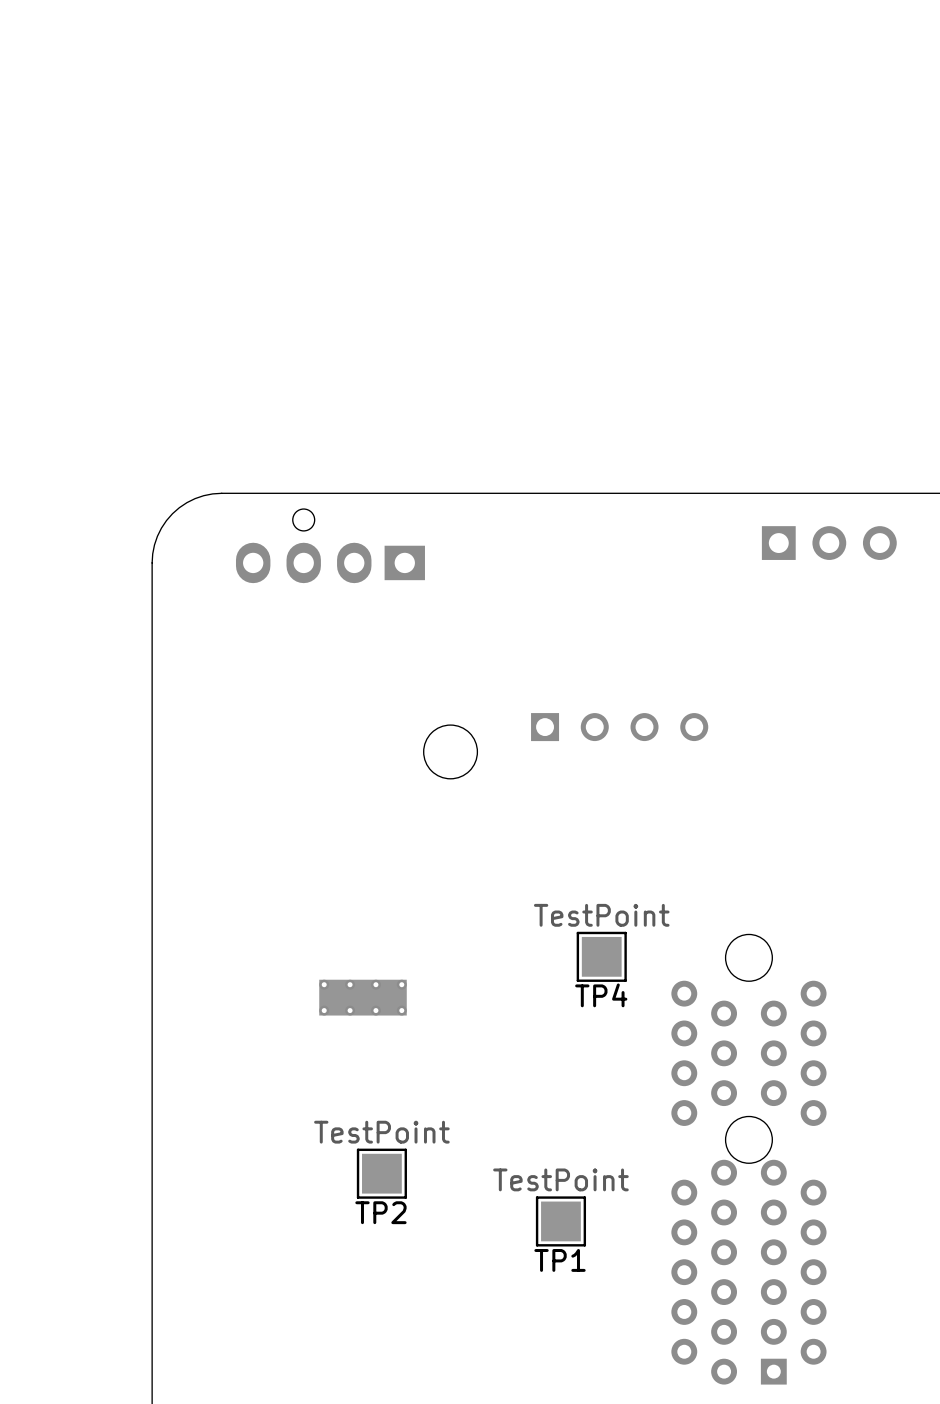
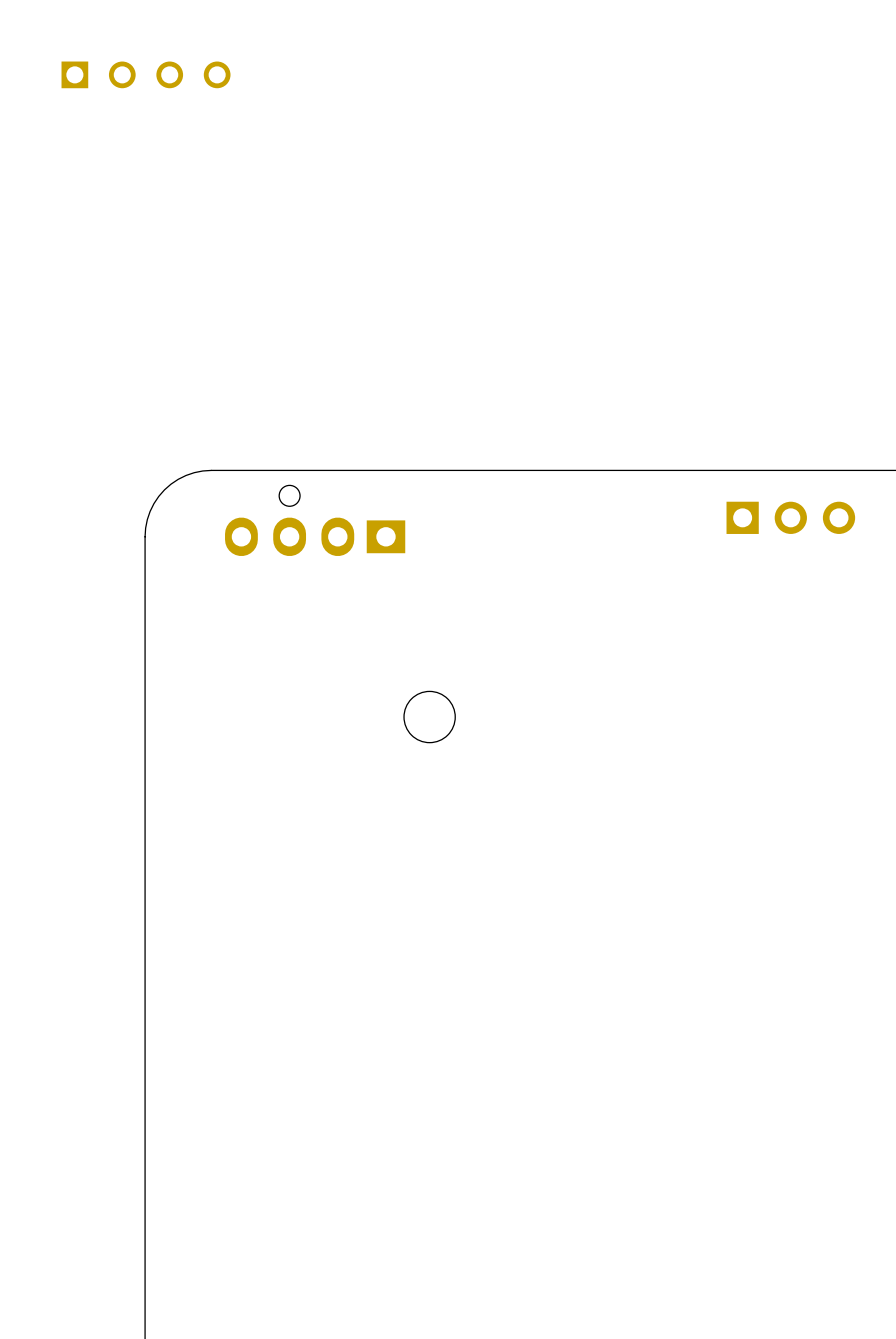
part: none -> (146, 74)
part: (619, 727) -> none
TP4: TestPoint (601, 956) -> none
part: (363, 997) -> none
part: (748, 1159) -> none
TP2: TestPoint (381, 1173) -> none
TP1: TestPoint (560, 1221) -> none

